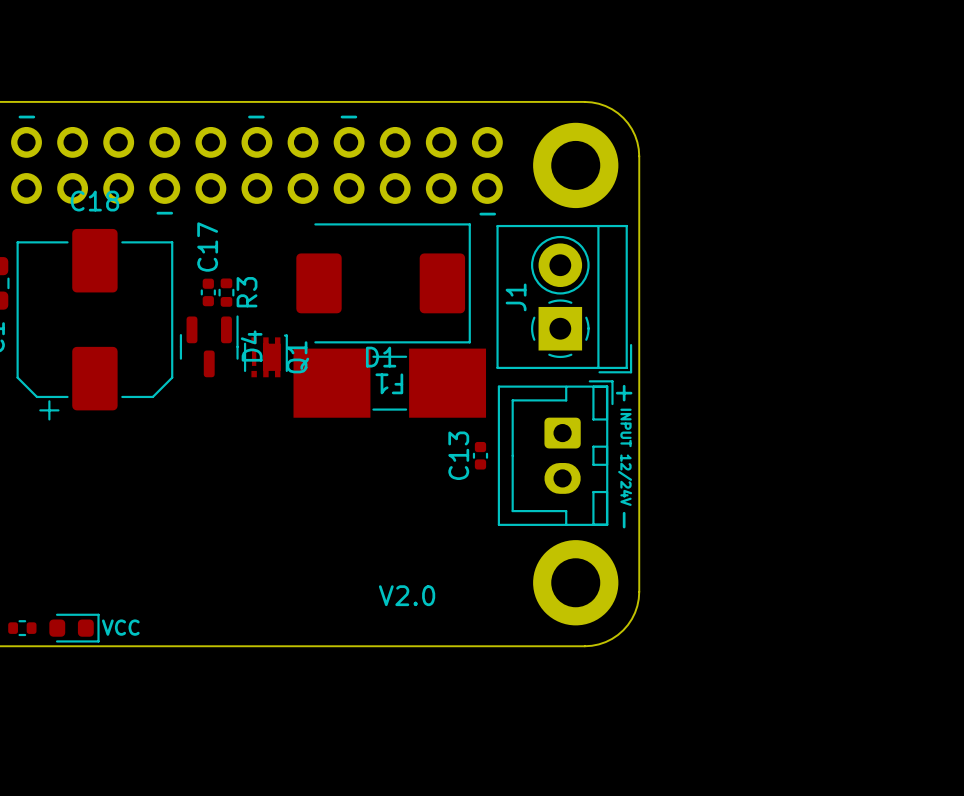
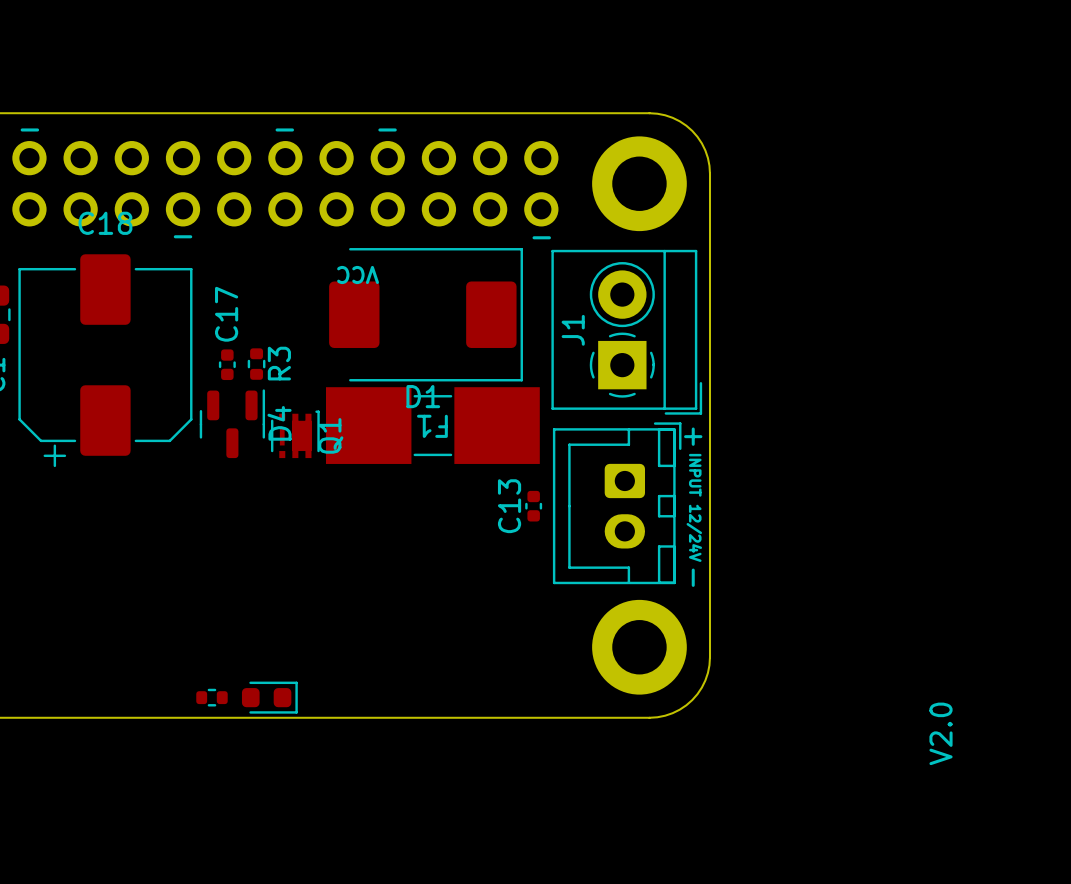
C17 position: (208, 292) -> (227, 364)
R3 position: (226, 292) -> (256, 364)
D4 position: (209, 346) -> (232, 423)
Q1 position: (265, 355) -> (295, 434)
text rotation: 0° (407, 595) -> 90° counterclockwise (940, 733)
text position: V2.0 (407, 595) -> V2.0 (940, 733)
text rotation: 0° (120, 627) -> 180° (358, 274)
text position: VCC (120, 627) -> VCC (358, 274)
part position: (22, 628) -> (211, 697)
part position: (74, 628) -> (269, 697)

